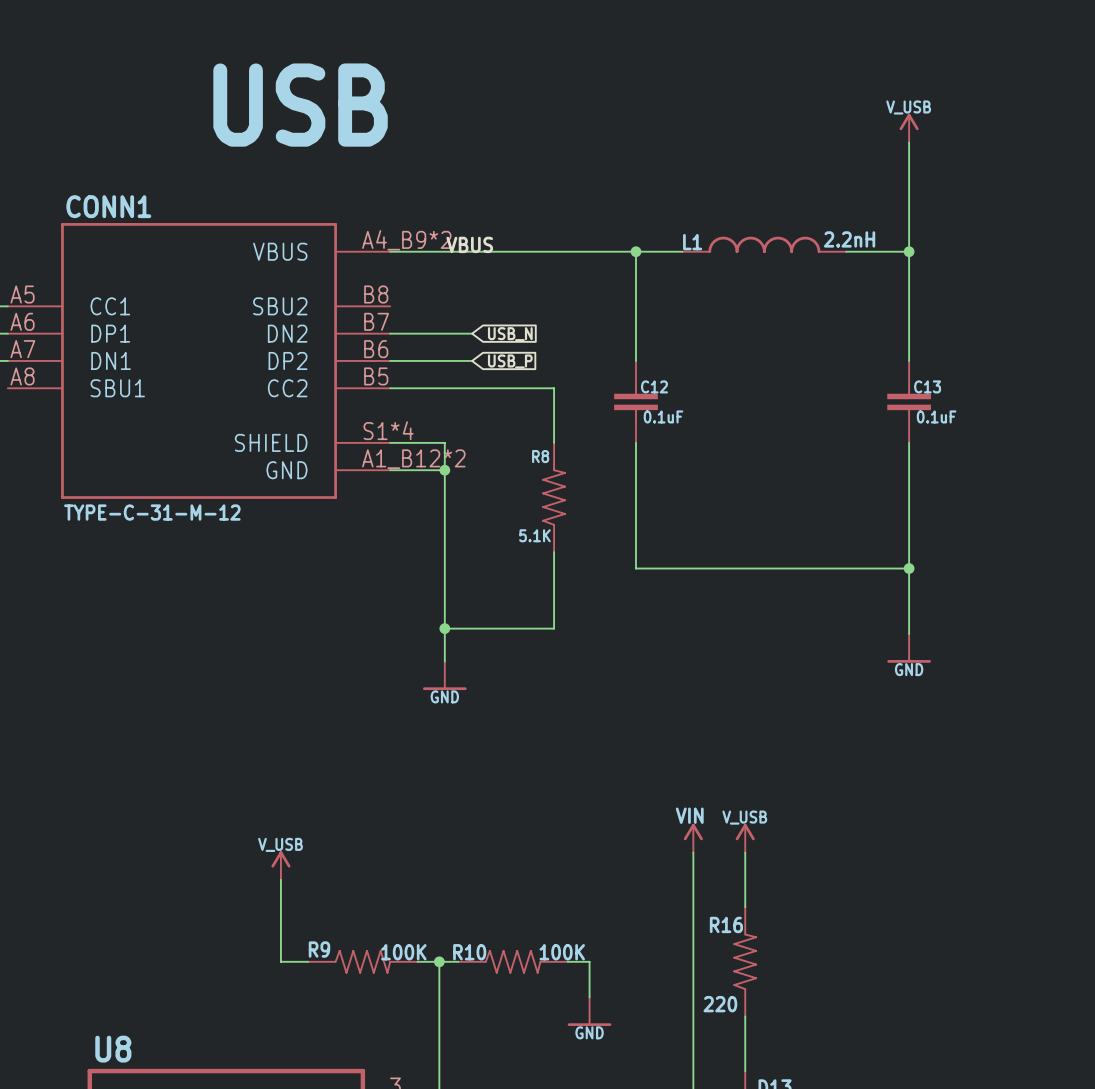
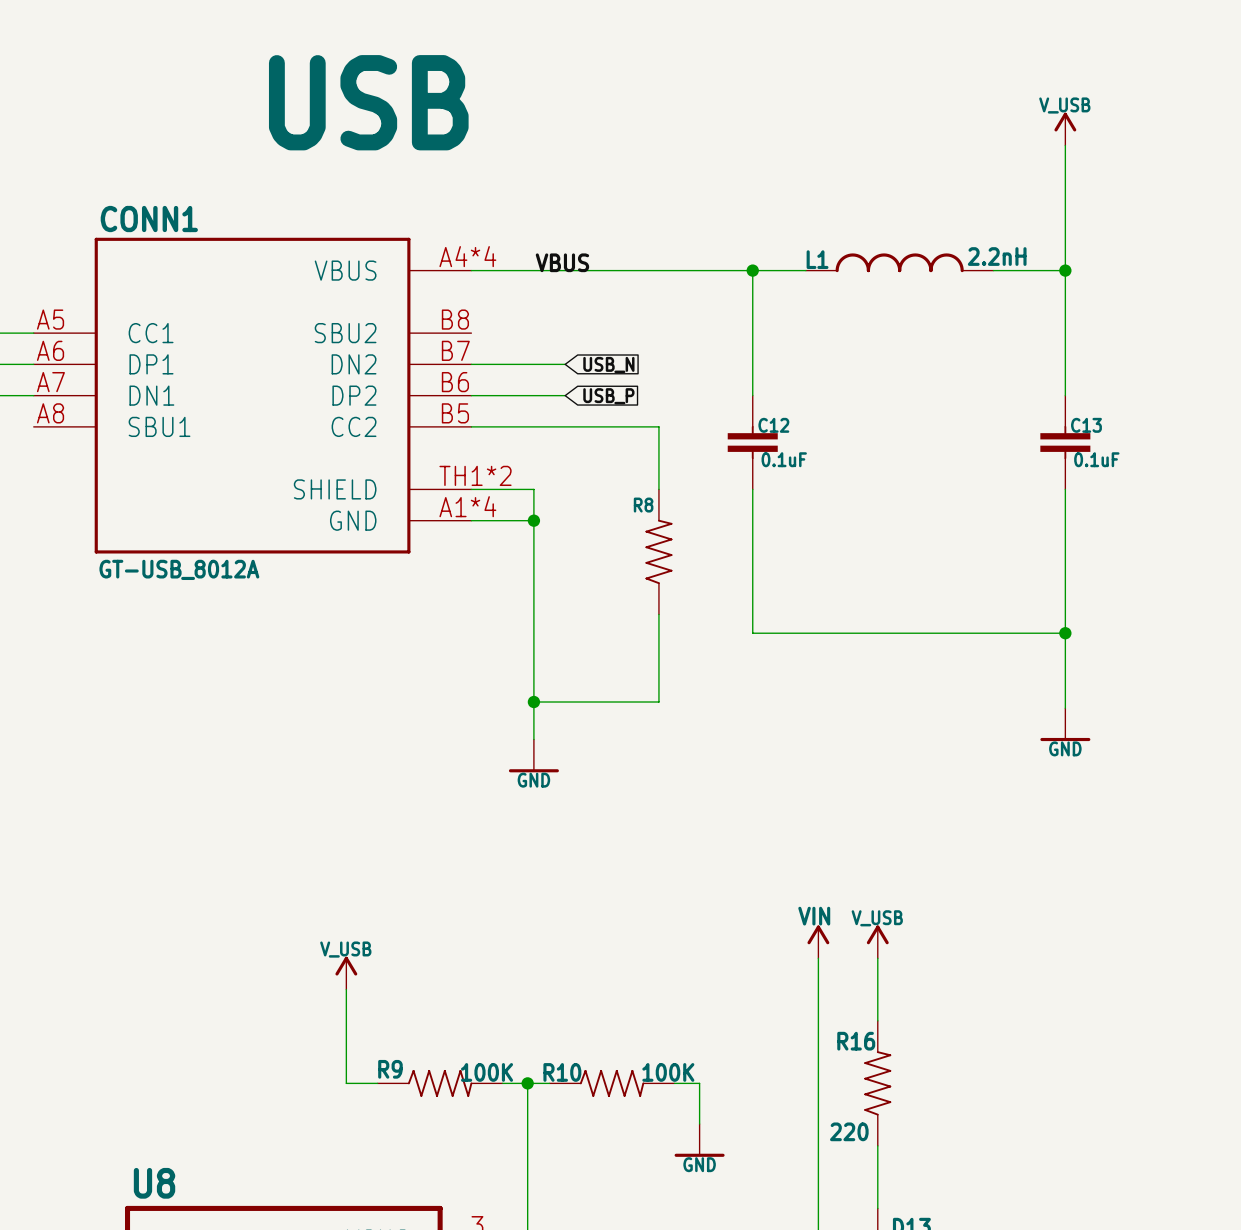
CONN1 pin number: A4_B9*2 (406, 240) -> A4*4 (467, 256)
CONN1 pin number: S1*4 (388, 430) -> TH1*2 (475, 475)
CONN1 pin number: A1_B12*2 (413, 459) -> A1*4 (467, 506)
CONN1 value: TYPE-C-31-M-12 (152, 512) -> GT-USB_8012A (179, 569)
R8 value: 5.1K (534, 535) -> none

